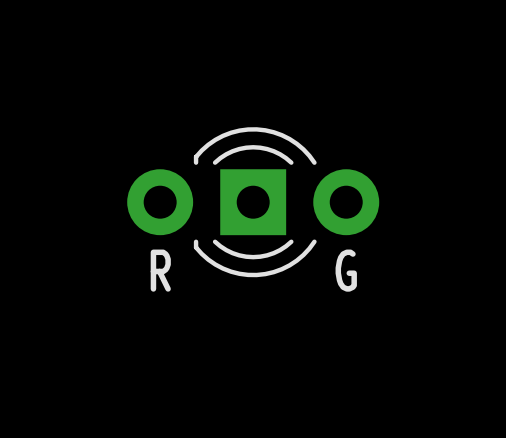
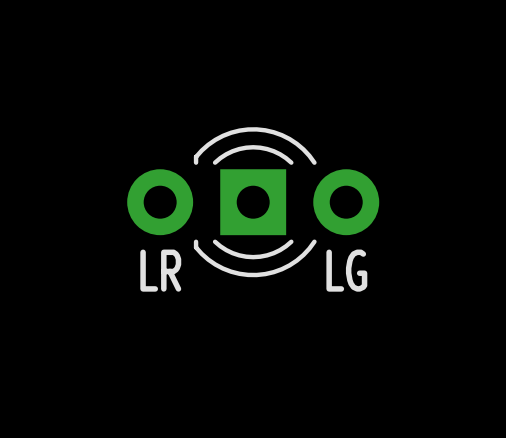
text: R (160, 270) -> LR (160, 270)
text: G (346, 270) -> LG (346, 270)

